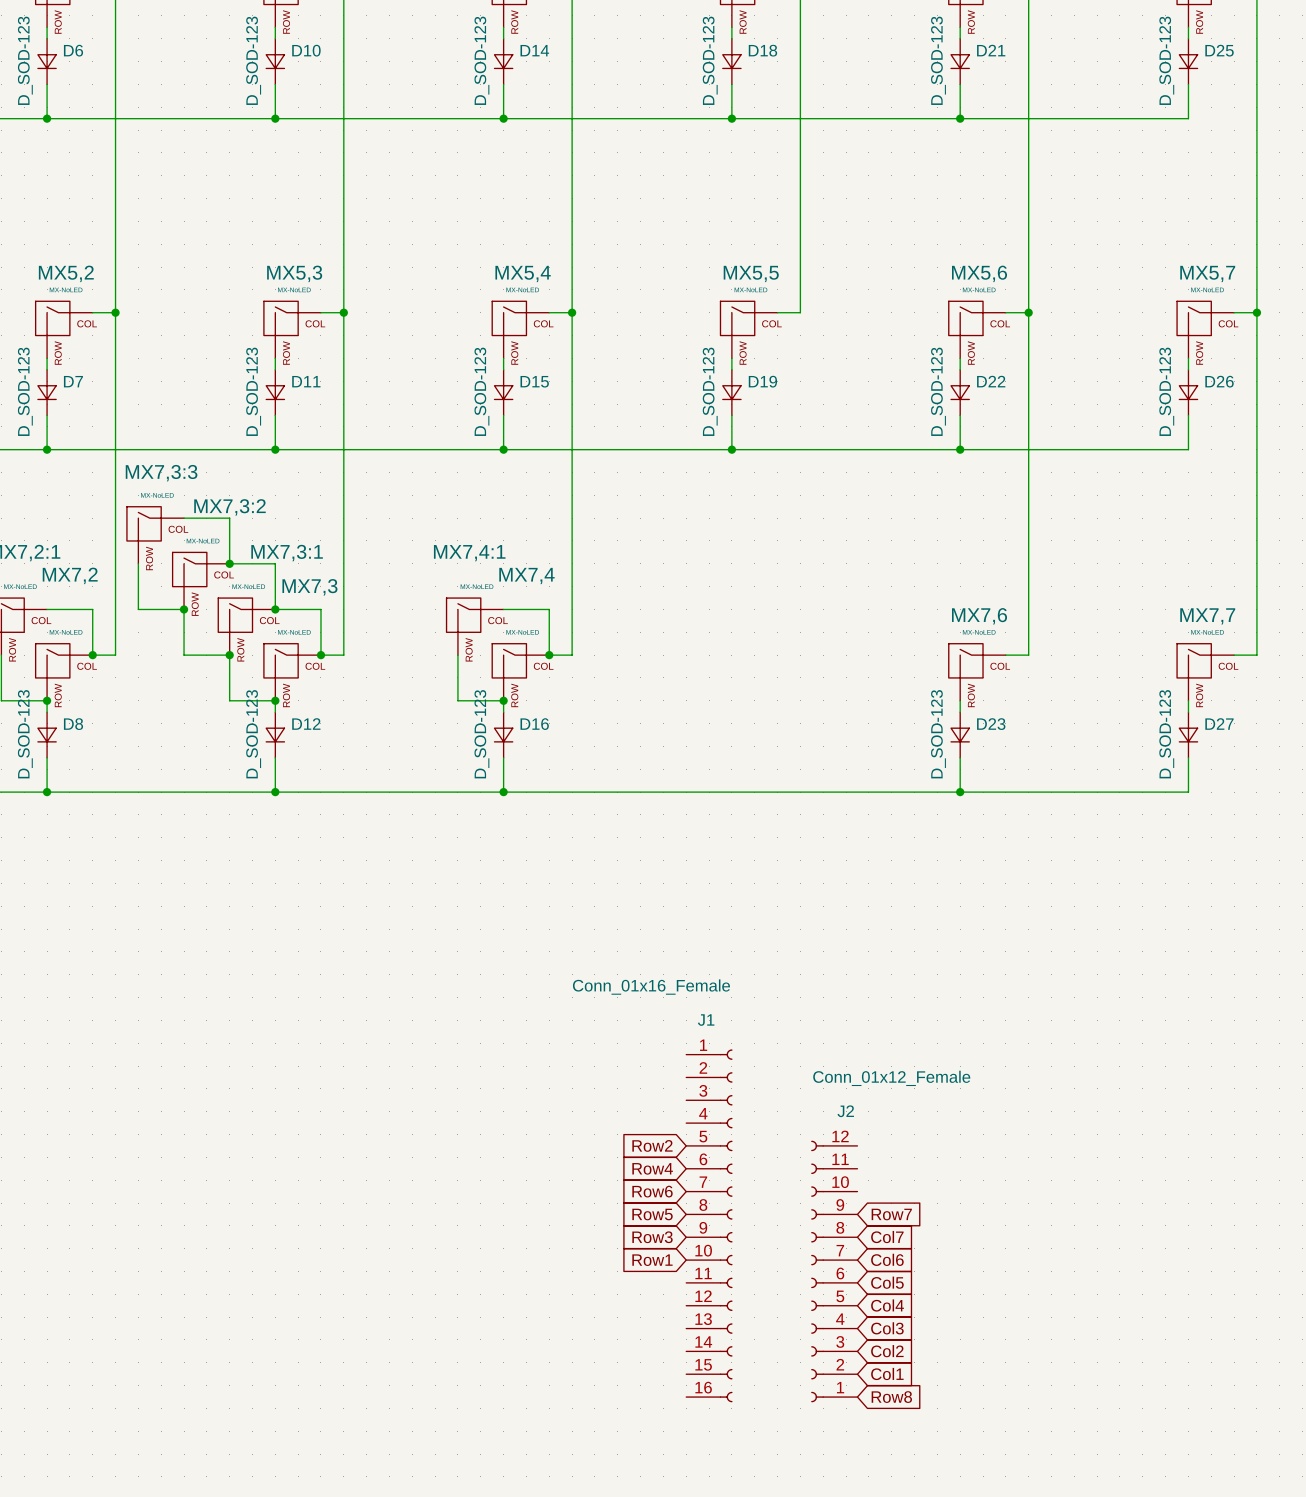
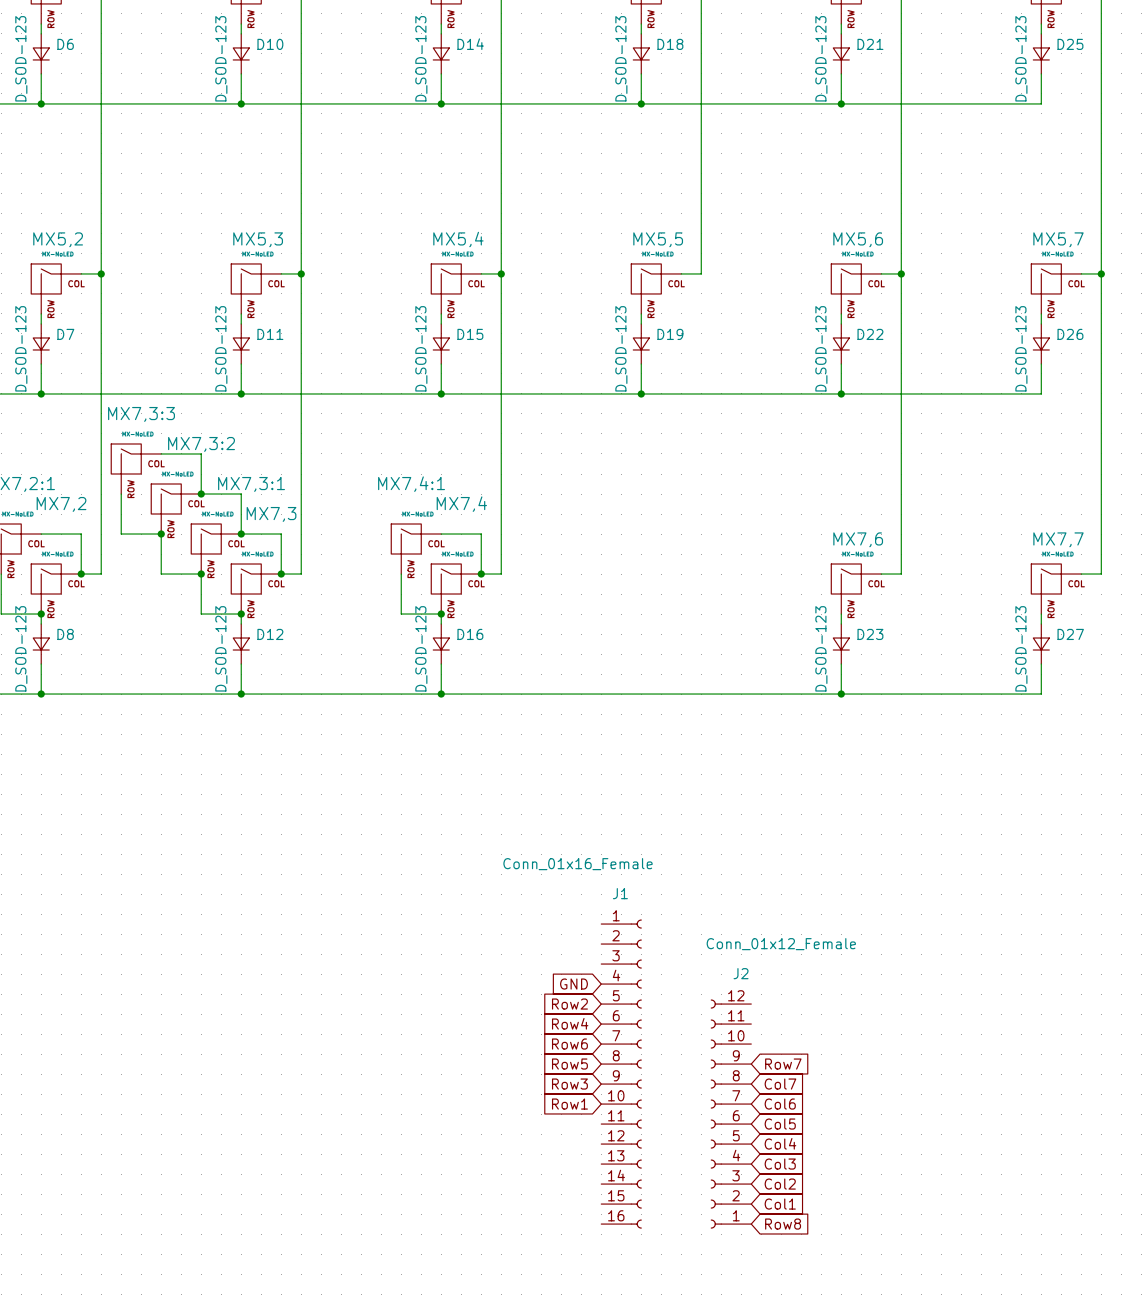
global label: none -> GND (573, 984)

